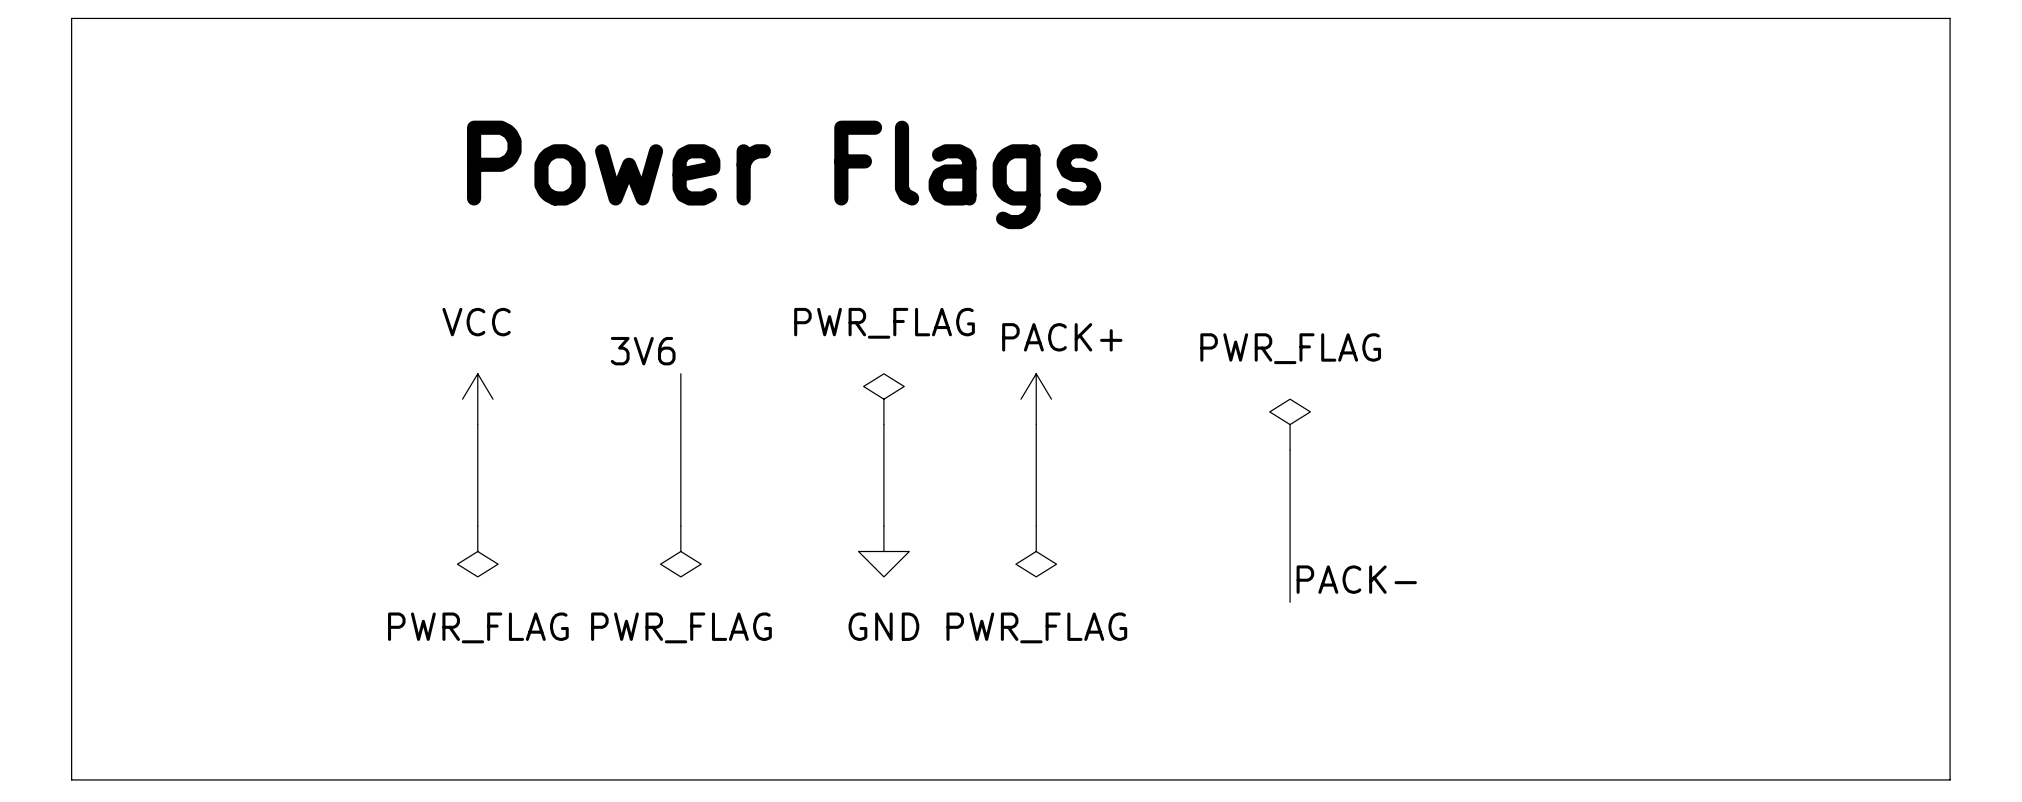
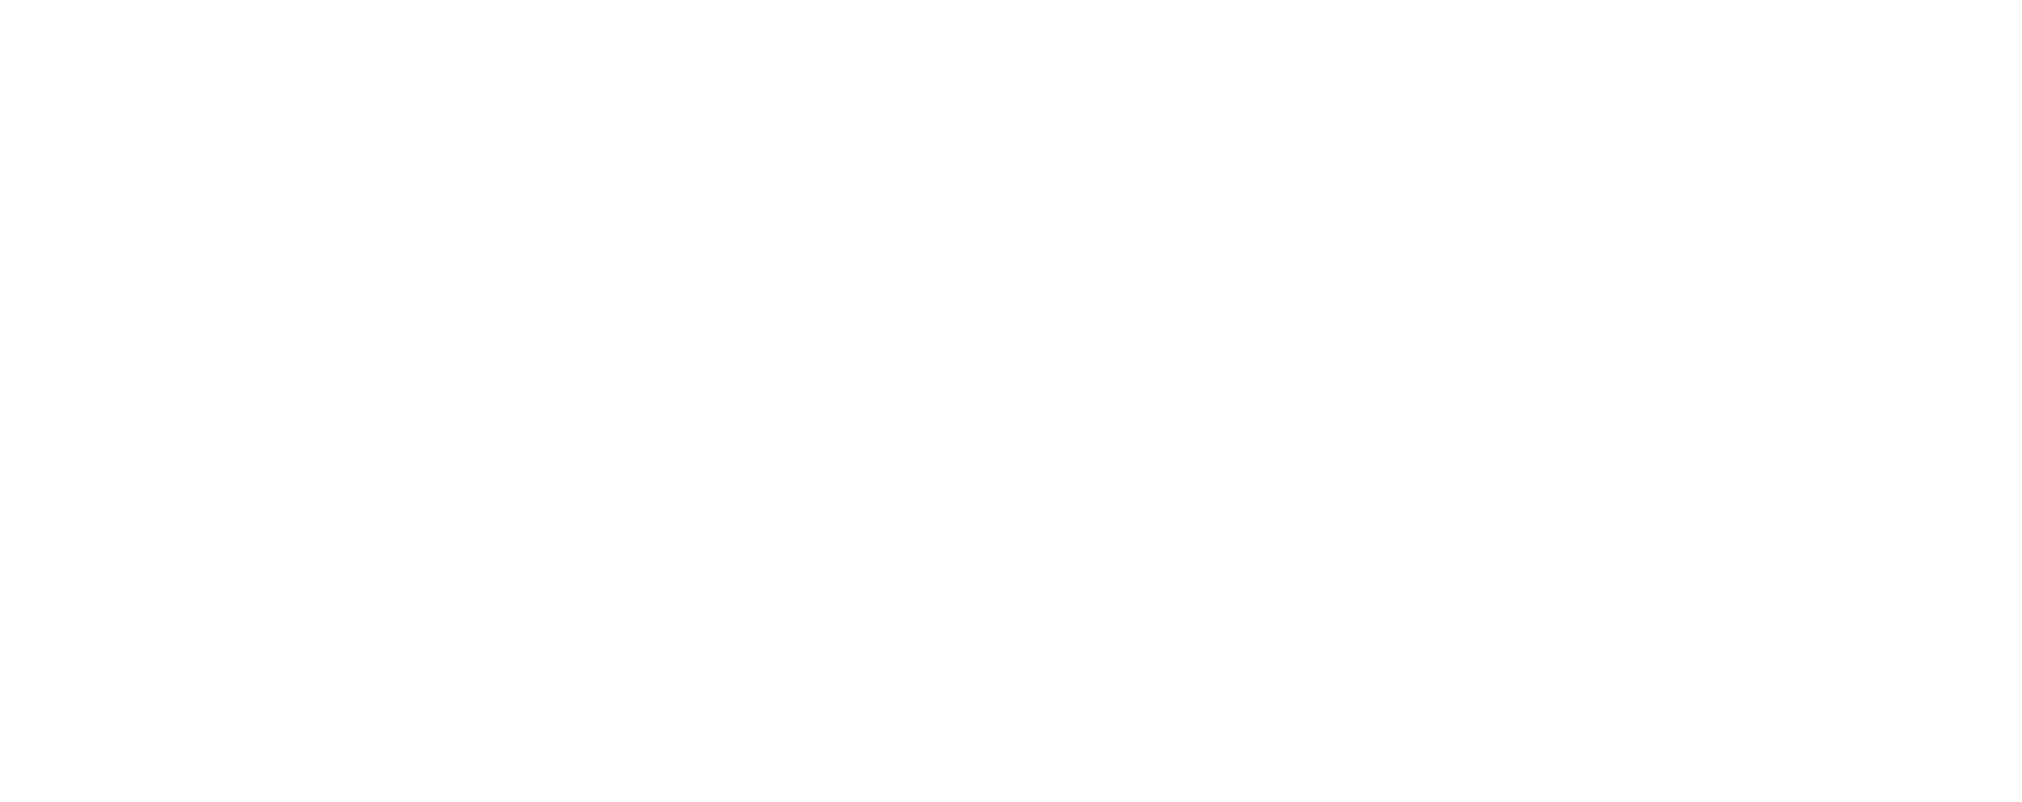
line: (71, 18) (1950, 18) (1950, 779) (71, 779) (71, 18) -> none
text: Power Flags (784, 174) -> none
label: 3V6 (643, 351) -> none
wire: (680, 373) (680, 526) -> none
power symbol: VCC (477, 399) -> none
power symbol: PWR_FLAG (883, 399) -> none
power symbol: PACK+ (1036, 399) -> none
wire: (477, 424) (477, 526) -> none
wire: (883, 424) (883, 526) -> none
wire: (1036, 424) (1036, 526) -> none
power symbol: PWR_FLAG (1290, 424) -> none
wire: (1290, 449) (1290, 602) -> none
power symbol: PWR_FLAG (477, 551) -> none
power symbol: PWR_FLAG (680, 551) -> none
power symbol: GND (883, 551) -> none
power symbol: PWR_FLAG (1036, 551) -> none
label: PACK- (1356, 579) -> none

